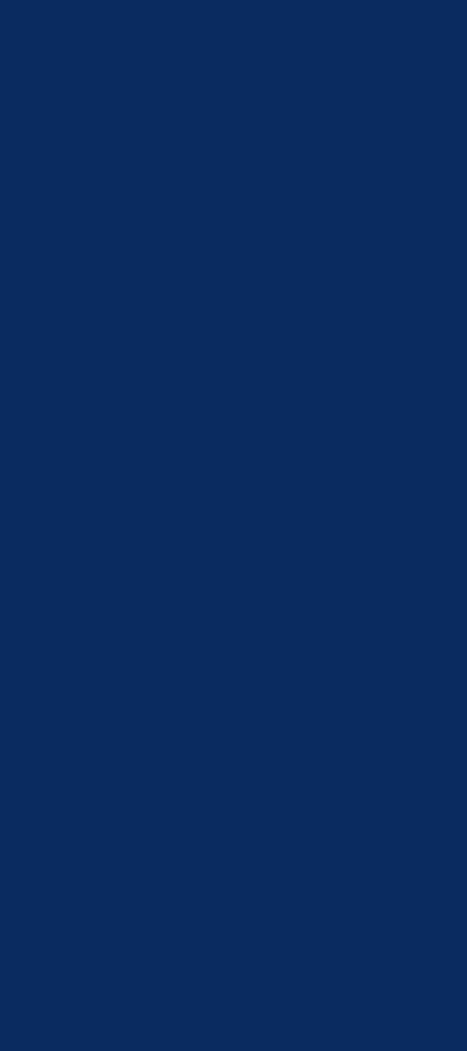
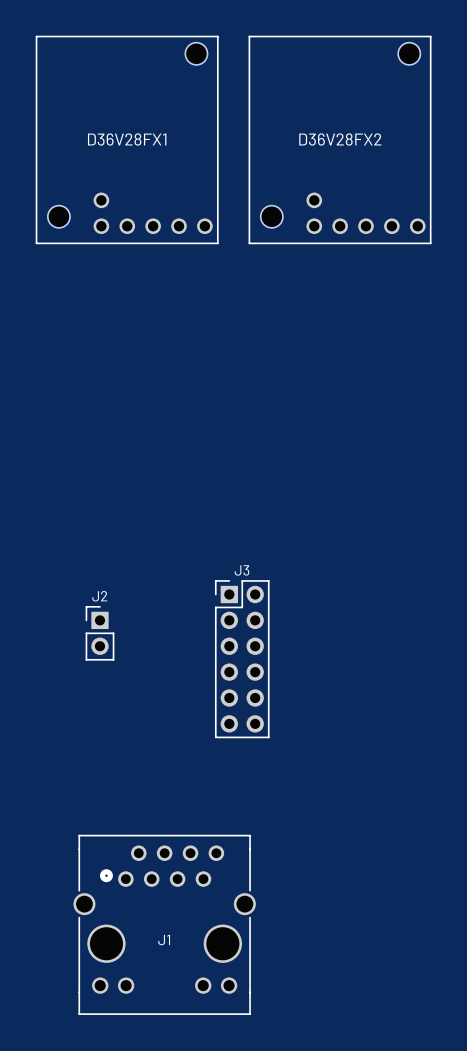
D36V28FX1: none -> (127, 139)
D36V28FX2: none -> (340, 139)
J2: none -> (99, 633)
J3: none -> (242, 659)
J1: none -> (164, 924)

